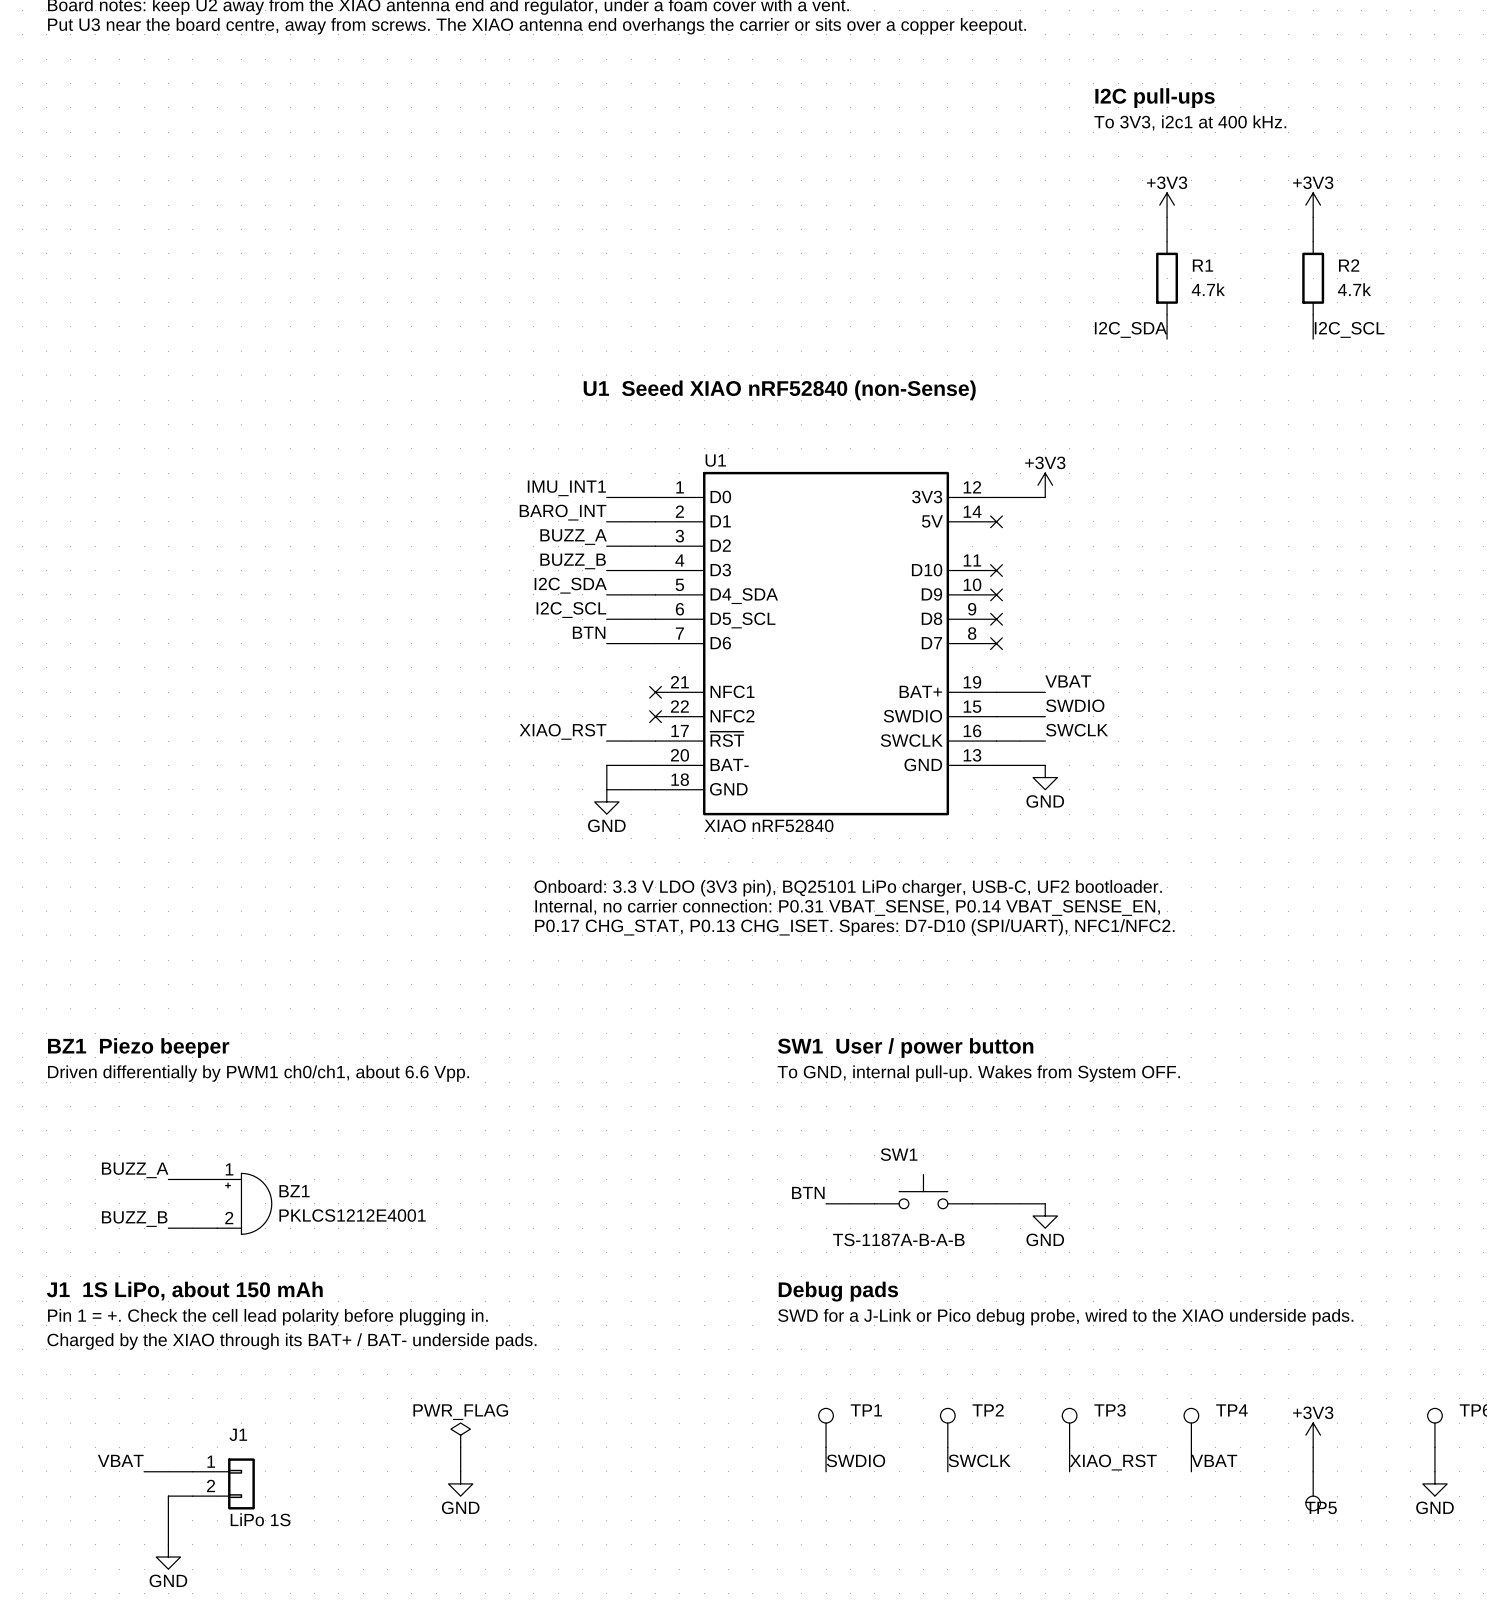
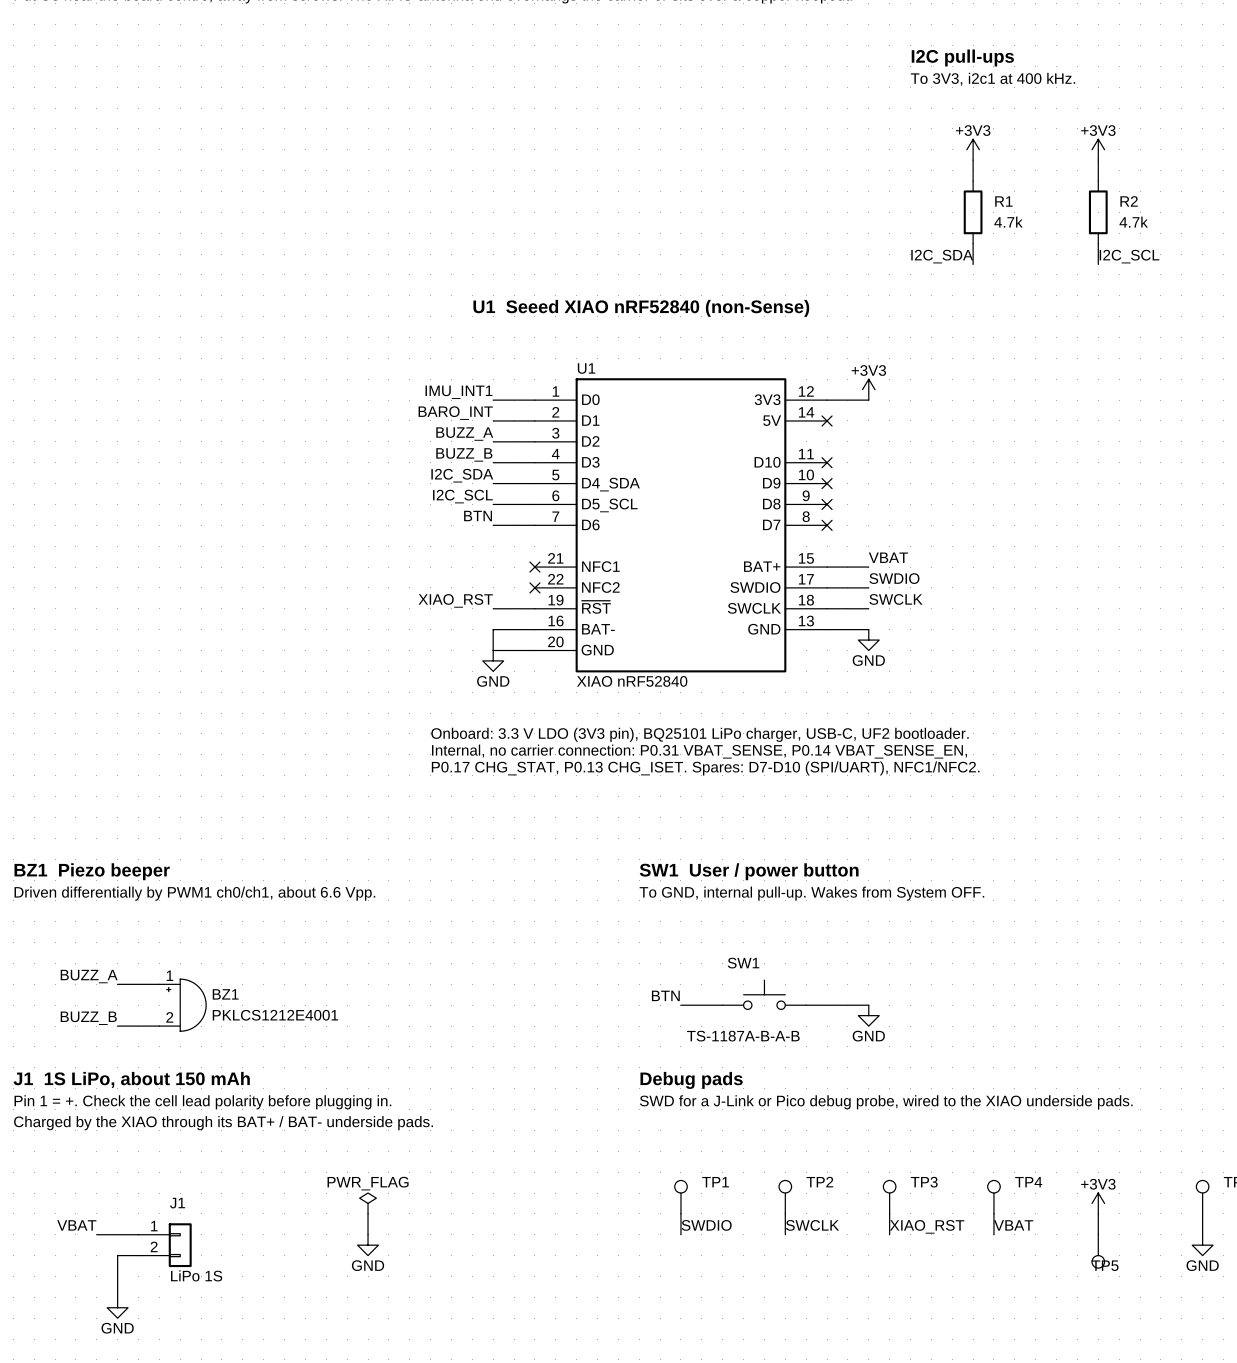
U1 pin number: 19 (972, 682) -> 15 (806, 558)
U1 pin number: 15 (972, 706) -> 17 (806, 579)
U1 pin number: 17 (680, 730) -> 19 (556, 600)
U1 pin number: 16 (972, 730) -> 18 (806, 600)
U1 pin number: 20 (679, 755) -> 16 (556, 621)
U1 pin number: 18 (680, 779) -> 20 (555, 641)

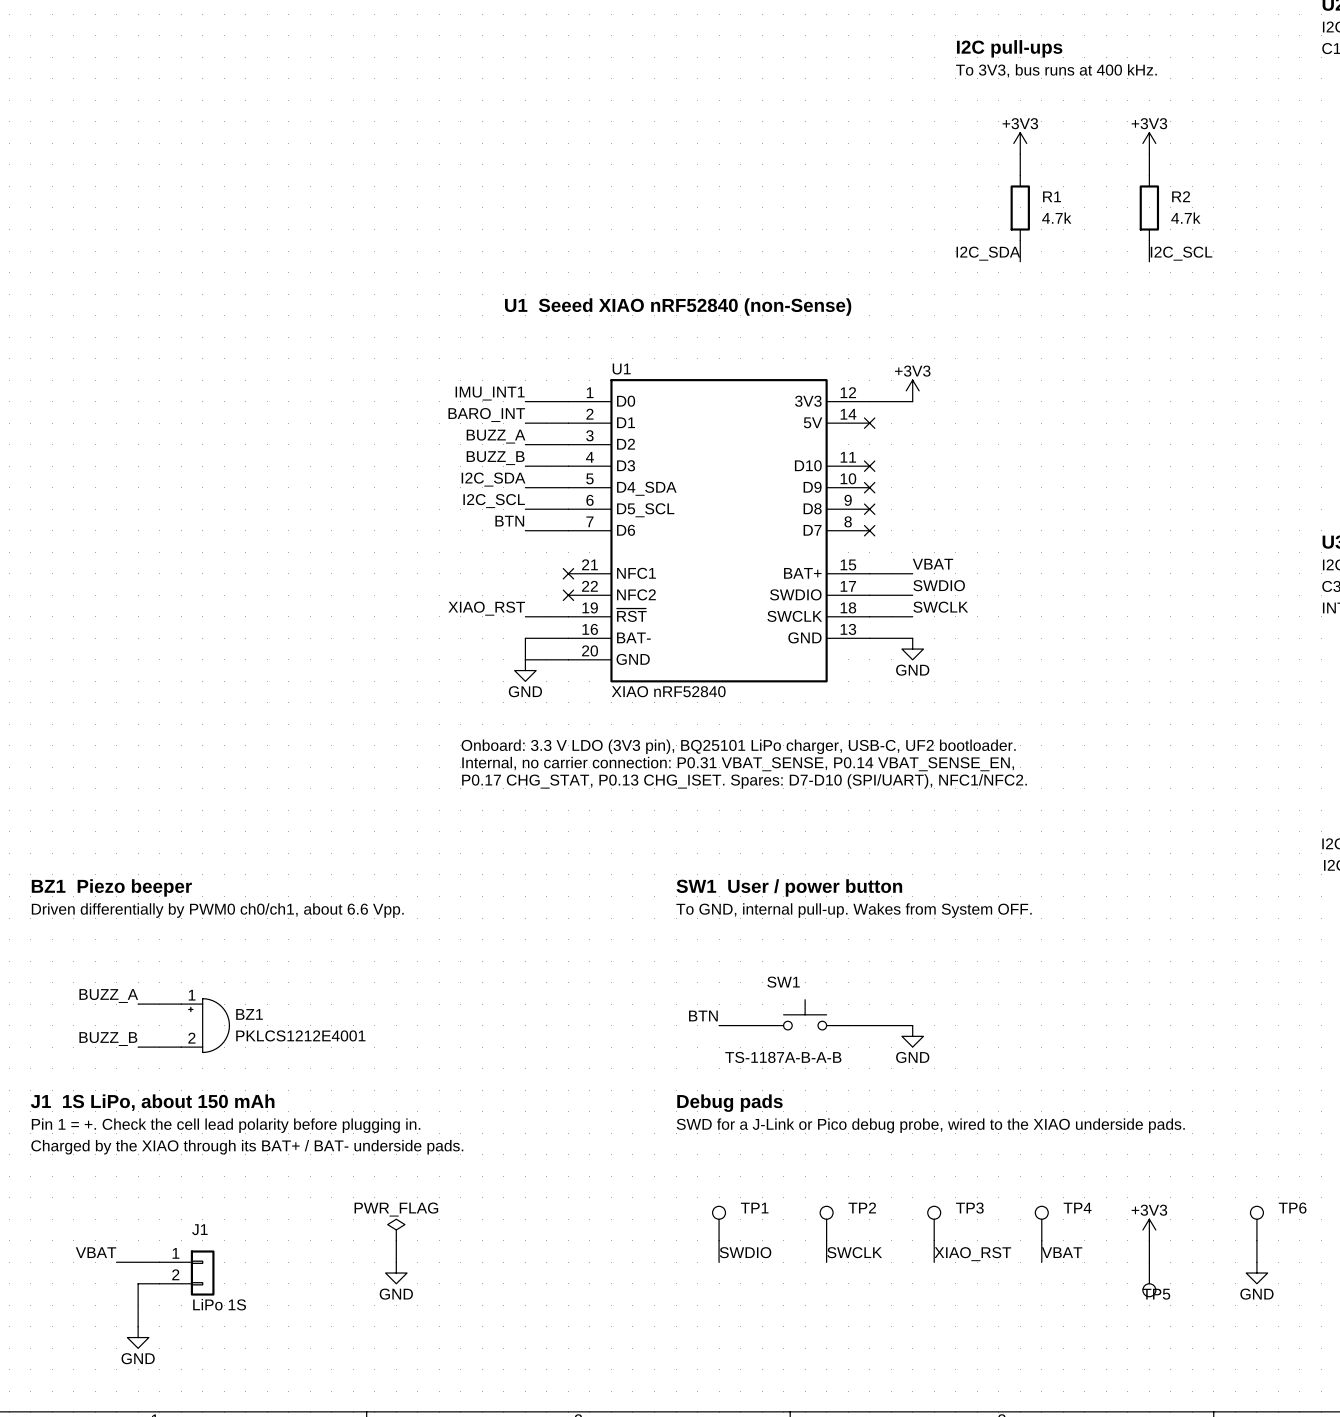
text: To 3V3, i2c1 at 400 kHz. (993, 79) -> To 3V3, bus runs at 400 kHz. (1056, 70)
text: Driven differentially by PWM1 ch0/ch1, about 6.6 Vpp. (194, 893) -> Driven differentially by PWM0 ch0/ch1, about 6.6 Vpp. (217, 910)

